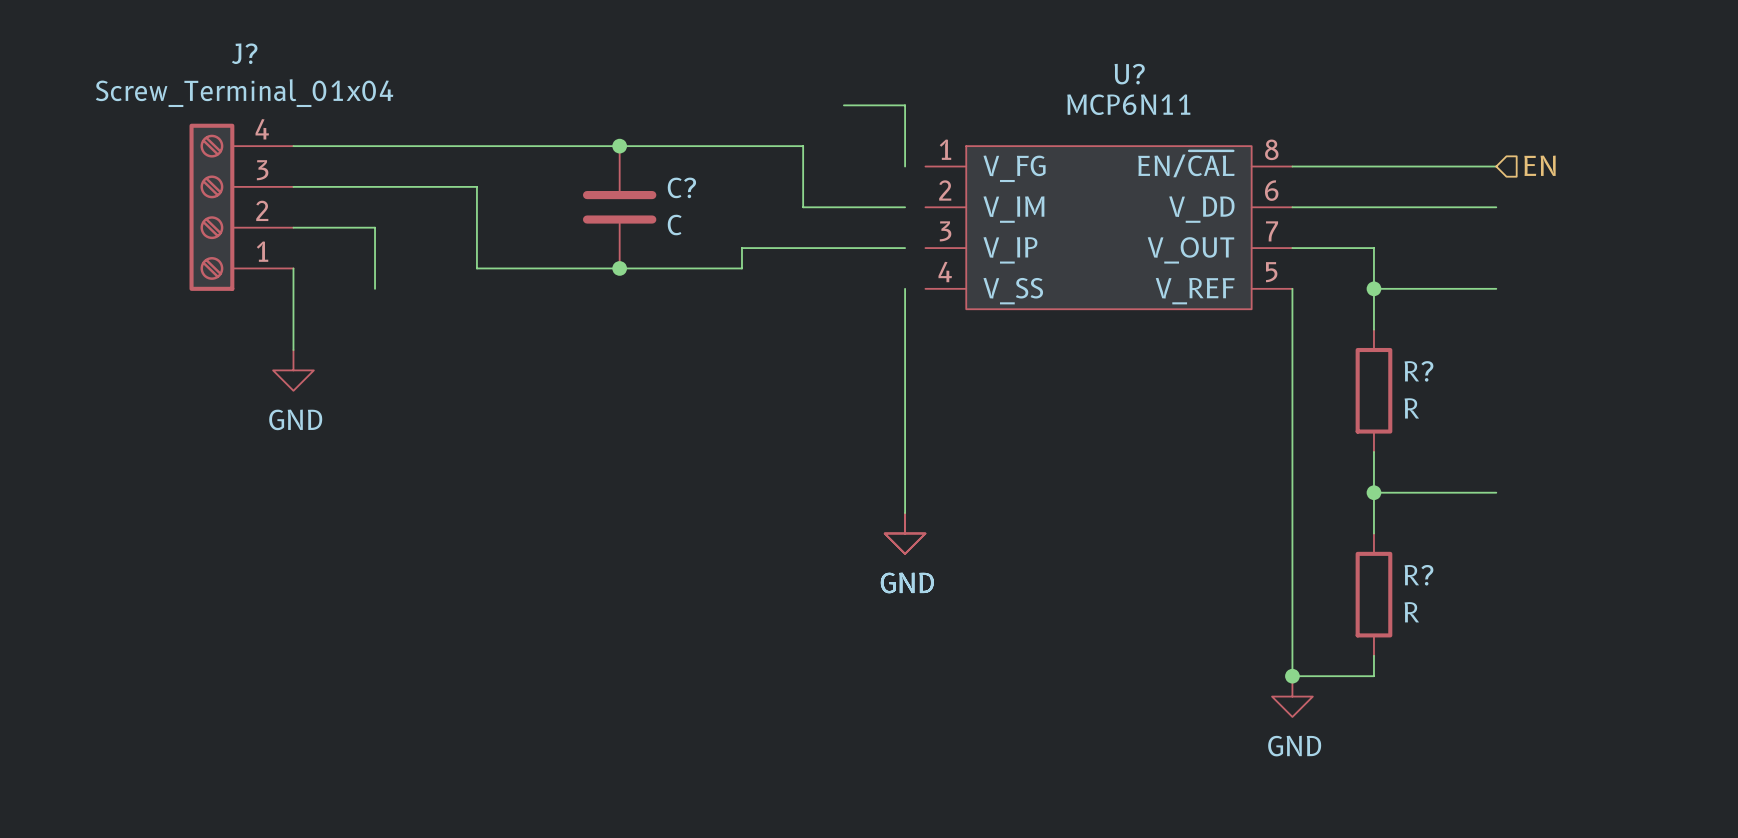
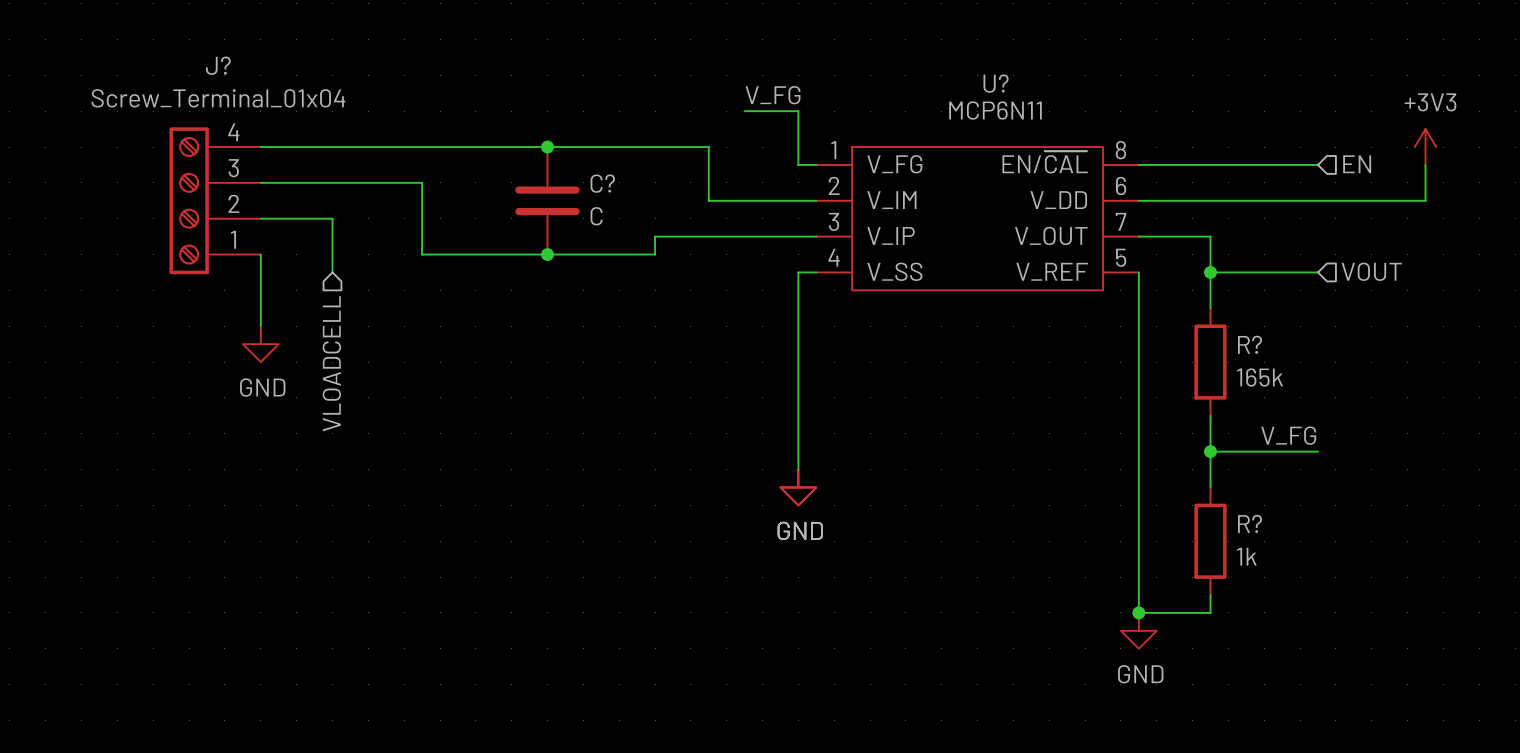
label: none -> V_FG (772, 95)
power symbol: none -> +3V3 (1425, 147)
wire: none -> (798, 164) (816, 164)
wire: none -> (1425, 164) (1425, 200) (1318, 200)
wire: none -> (798, 200) (816, 200)
wire: none -> (798, 236) (816, 236)
wire: none -> (798, 272) (816, 272)
hierarchical label: none -> VOUT (1371, 271)
hierarchical label: none -> VLOADCELL (331, 363)
R? value: R (1411, 408) -> 165k (1260, 377)
label: none -> V_FG (1288, 435)
R? value: R (1411, 612) -> 1k (1246, 556)

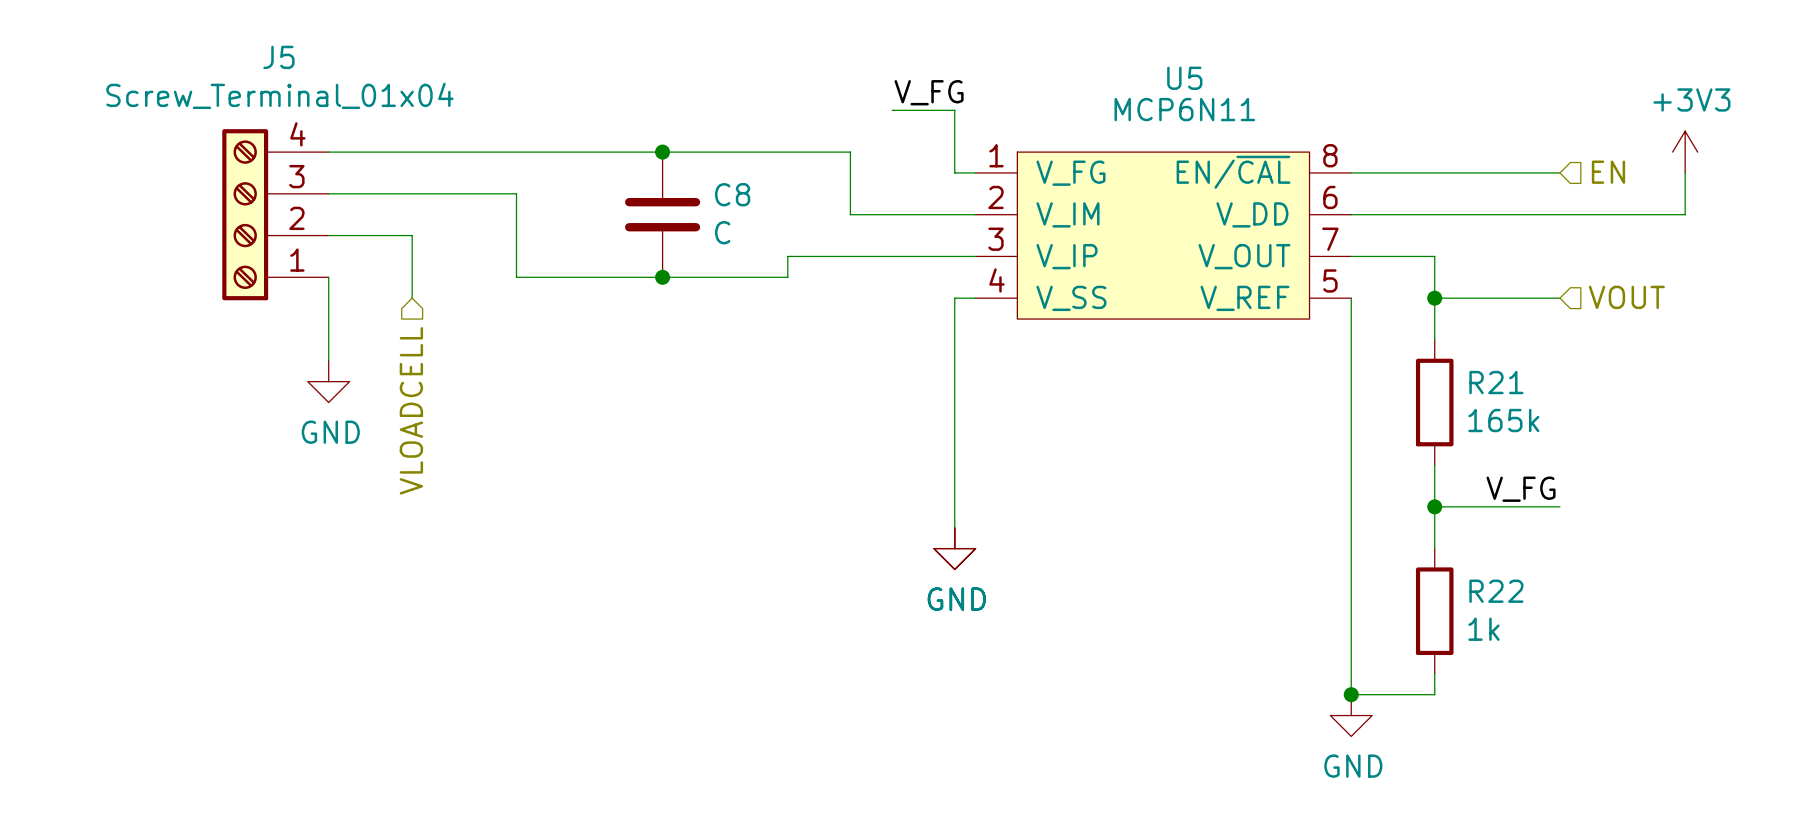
J? name: J? (218, 65) -> J5 (278, 57)
U? name: U? (996, 83) -> U5 (1184, 78)
C? name: C? (602, 183) -> C8 (732, 194)
R? name: R? (1249, 344) -> R21 (1496, 382)
R? name: R? (1249, 523) -> R22 (1496, 591)

